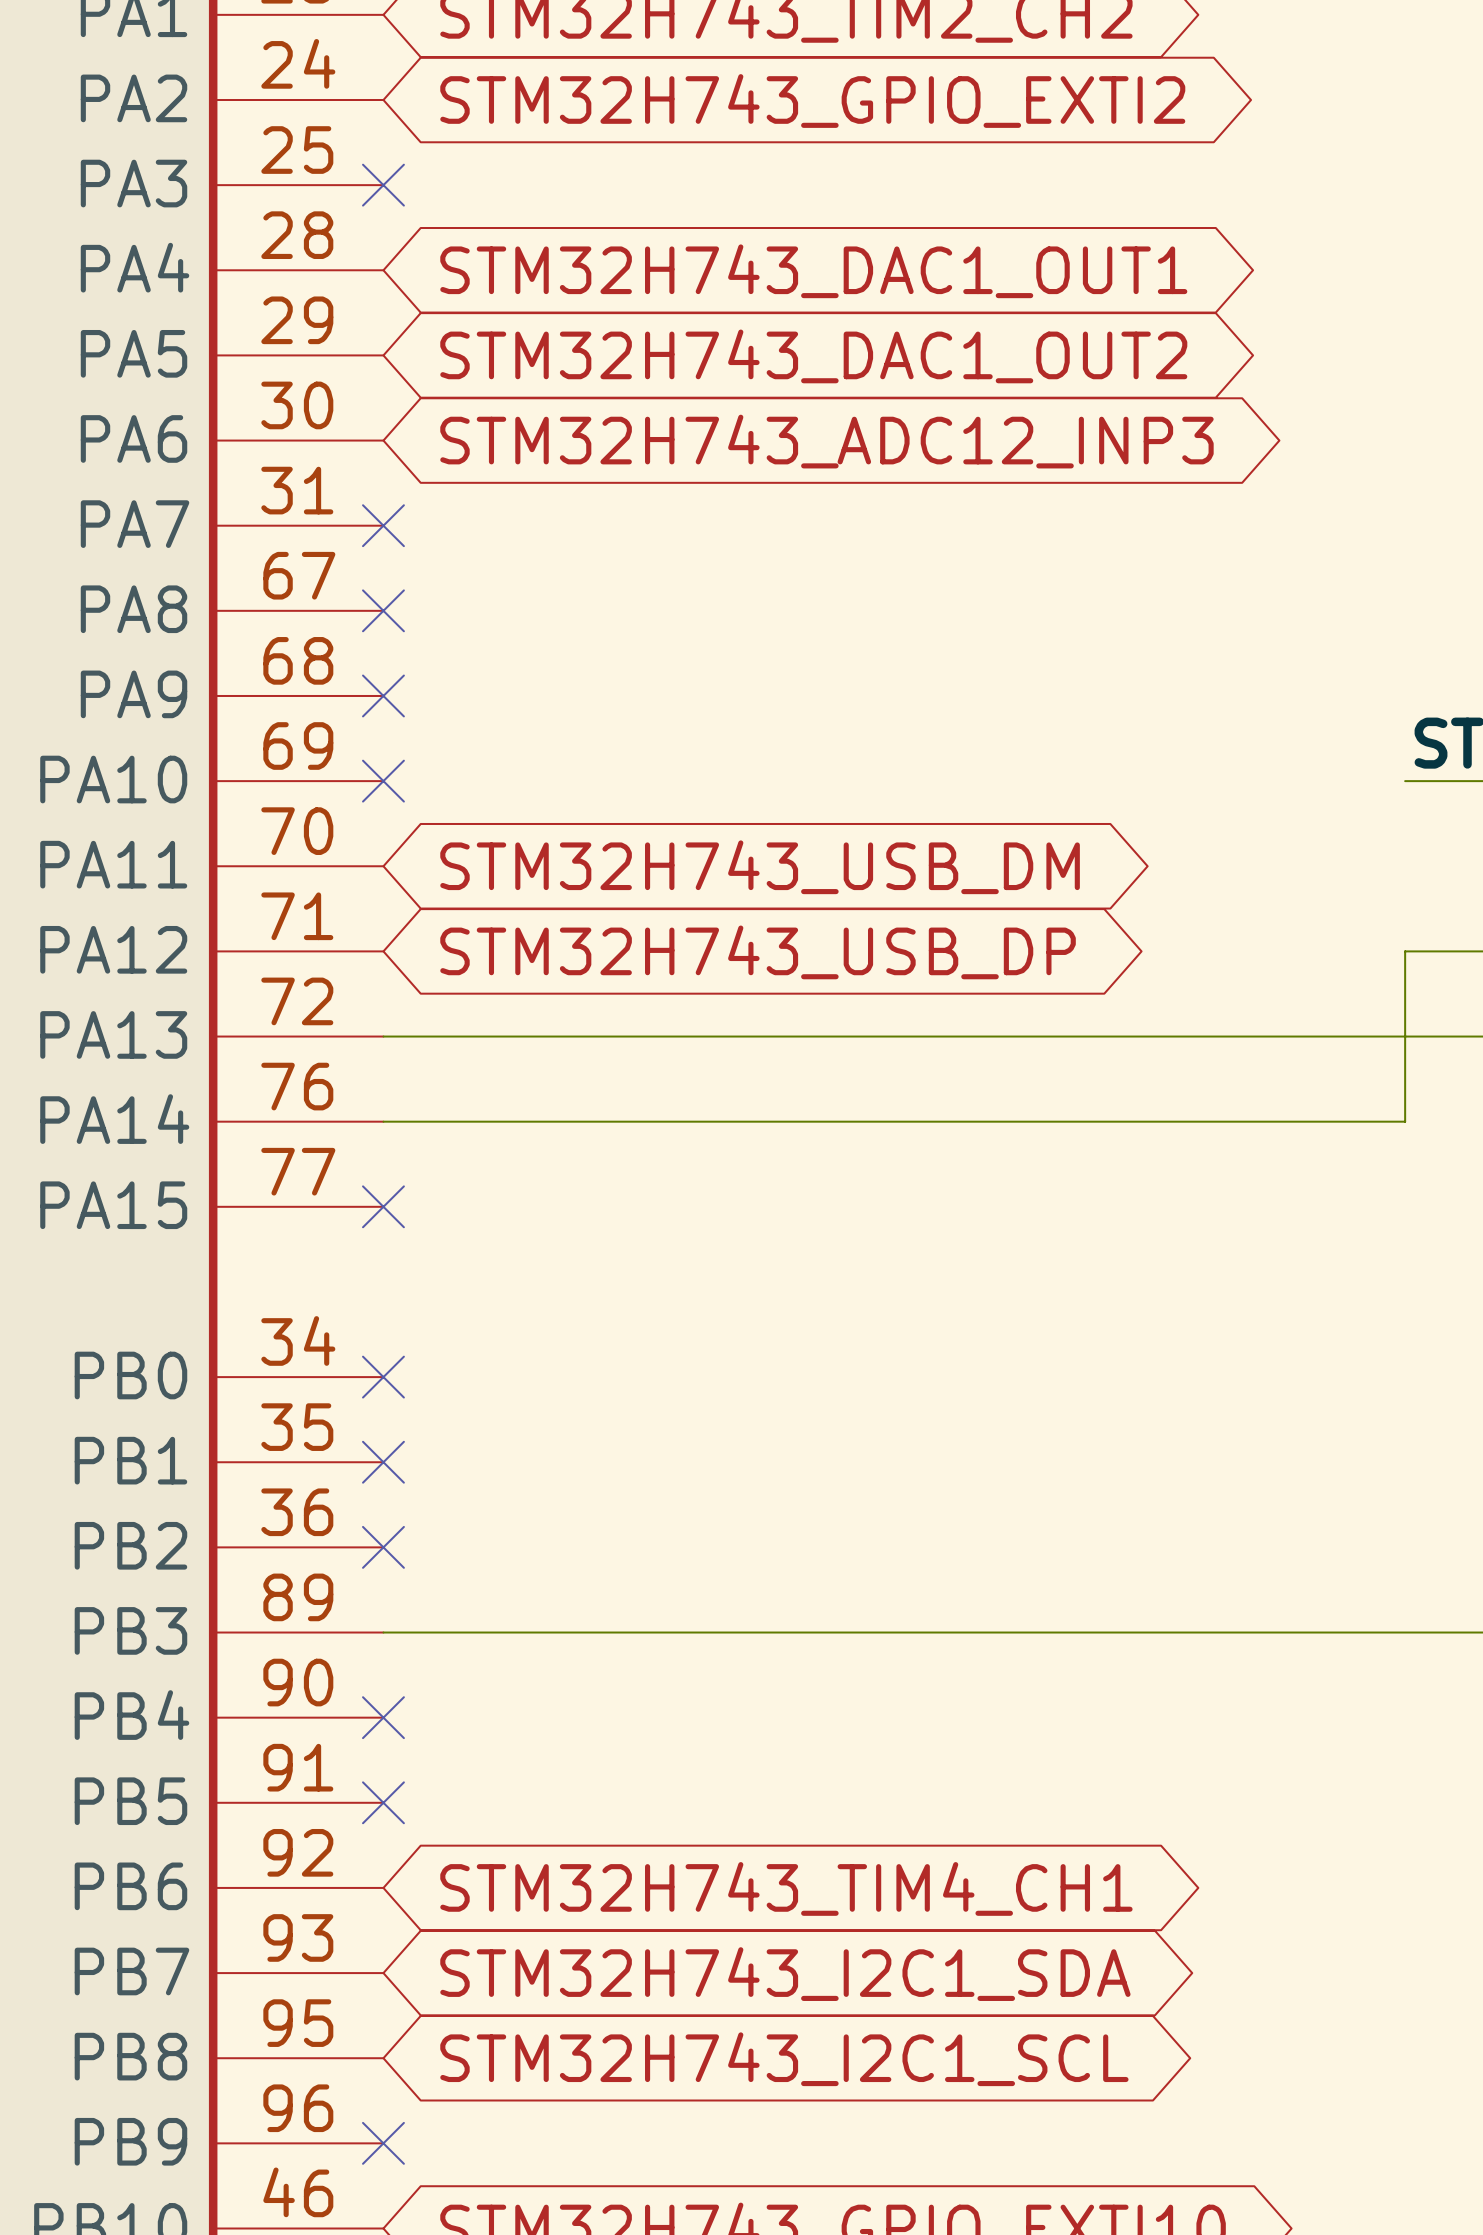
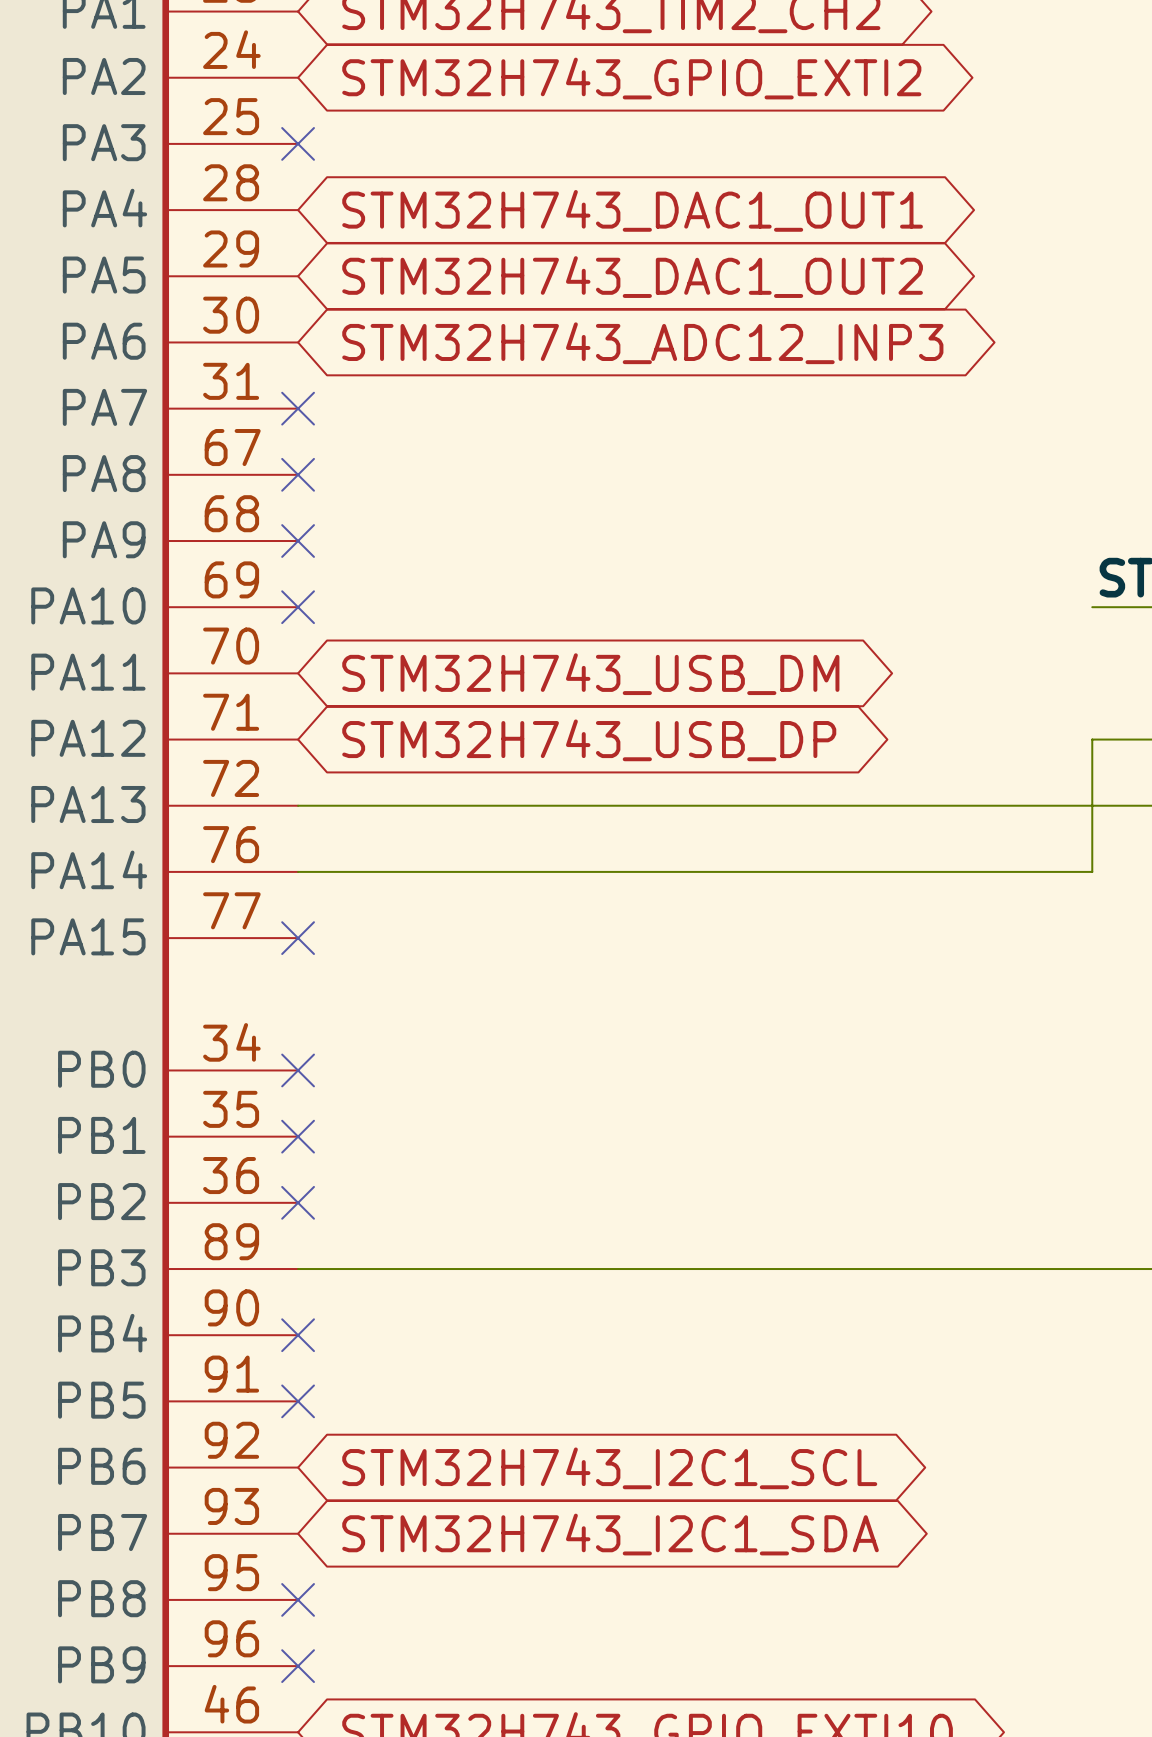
global label: STM32H743_TIM4_CH1 (786, 1888) -> STM32H743_I2C1_SCL (609, 1468)
no-connect mark: none -> (298, 1599)
global label: STM32H743_I2C1_SCL (784, 2059) -> none

